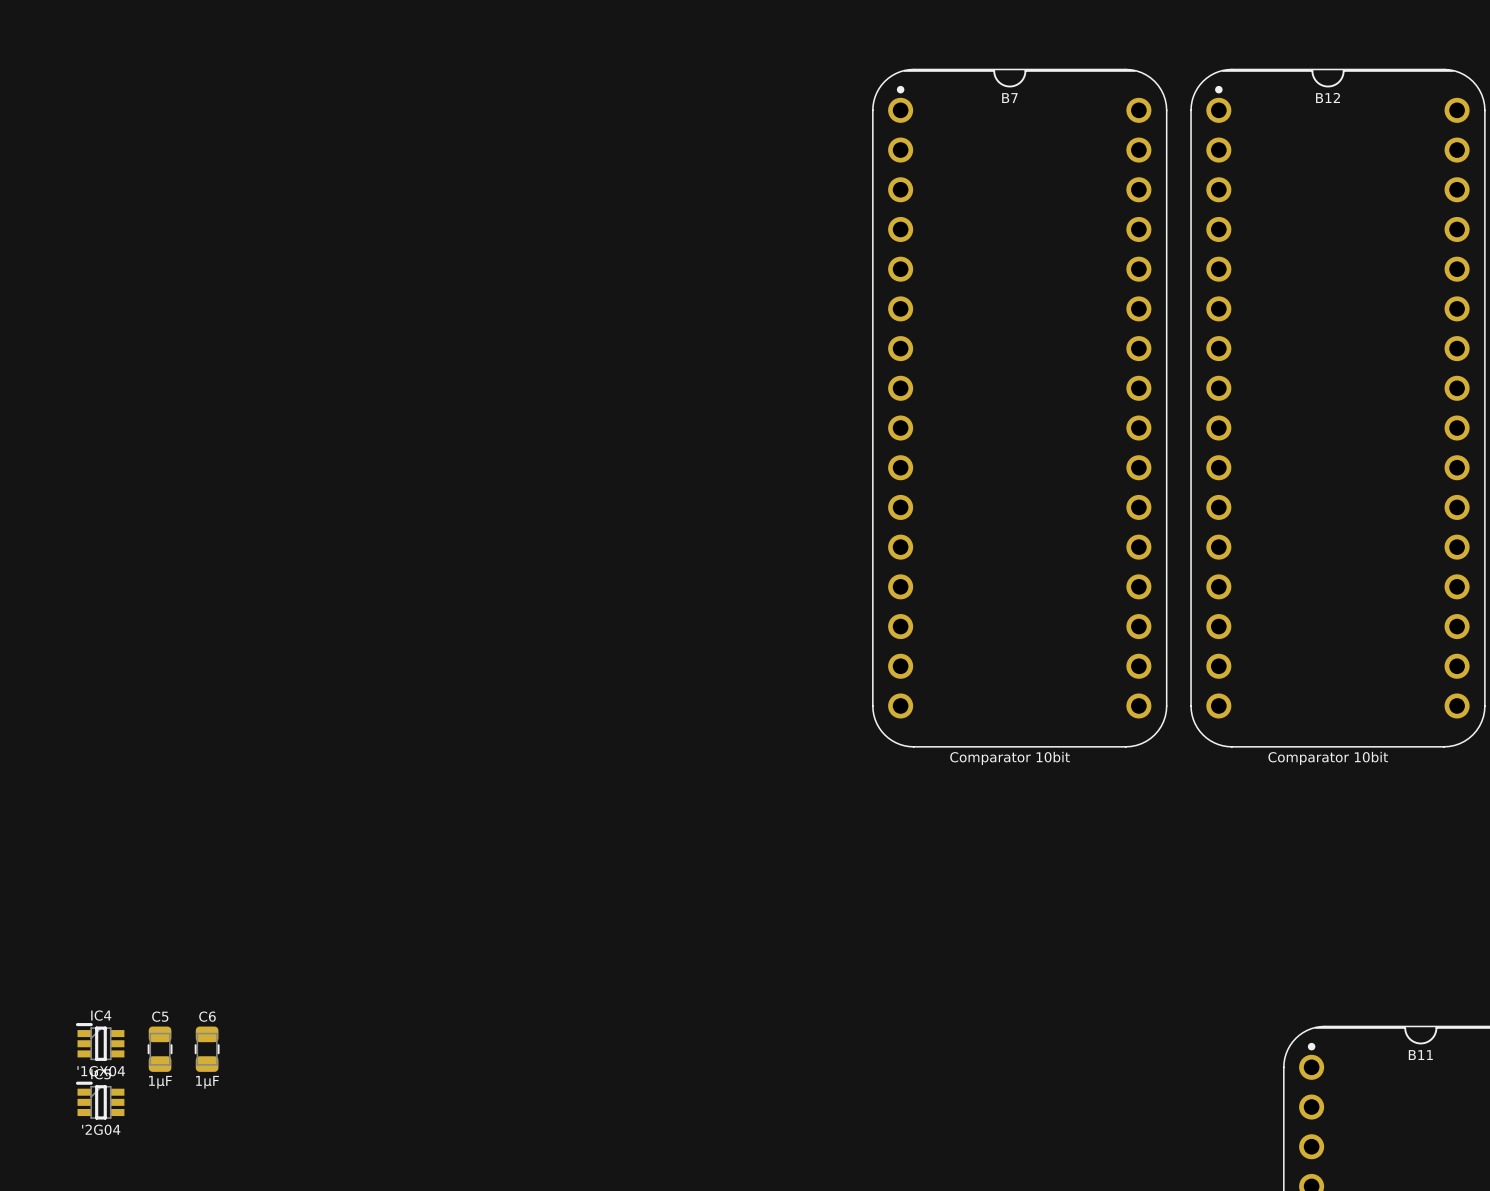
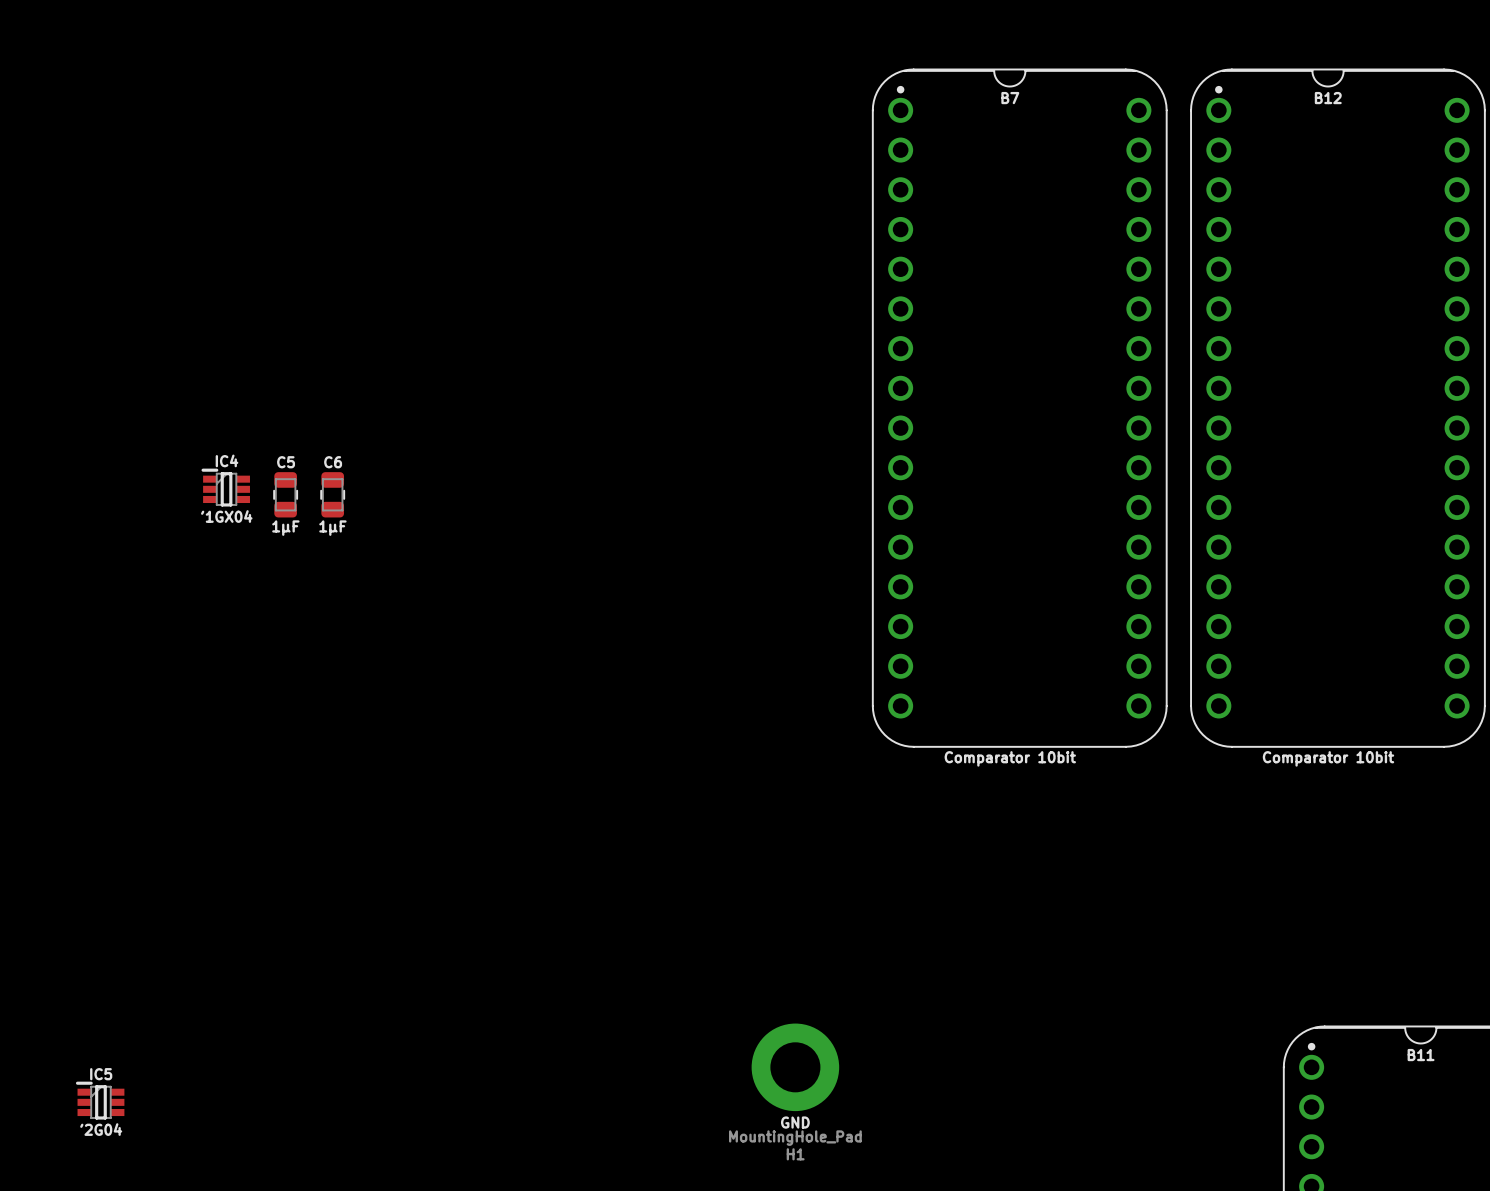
IC4 position: (100, 1041) -> (225, 487)
C5 position: (160, 1049) -> (285, 494)
C6 position: (207, 1049) -> (332, 494)
H1: none -> MountingHole_Pad (795, 1067)

